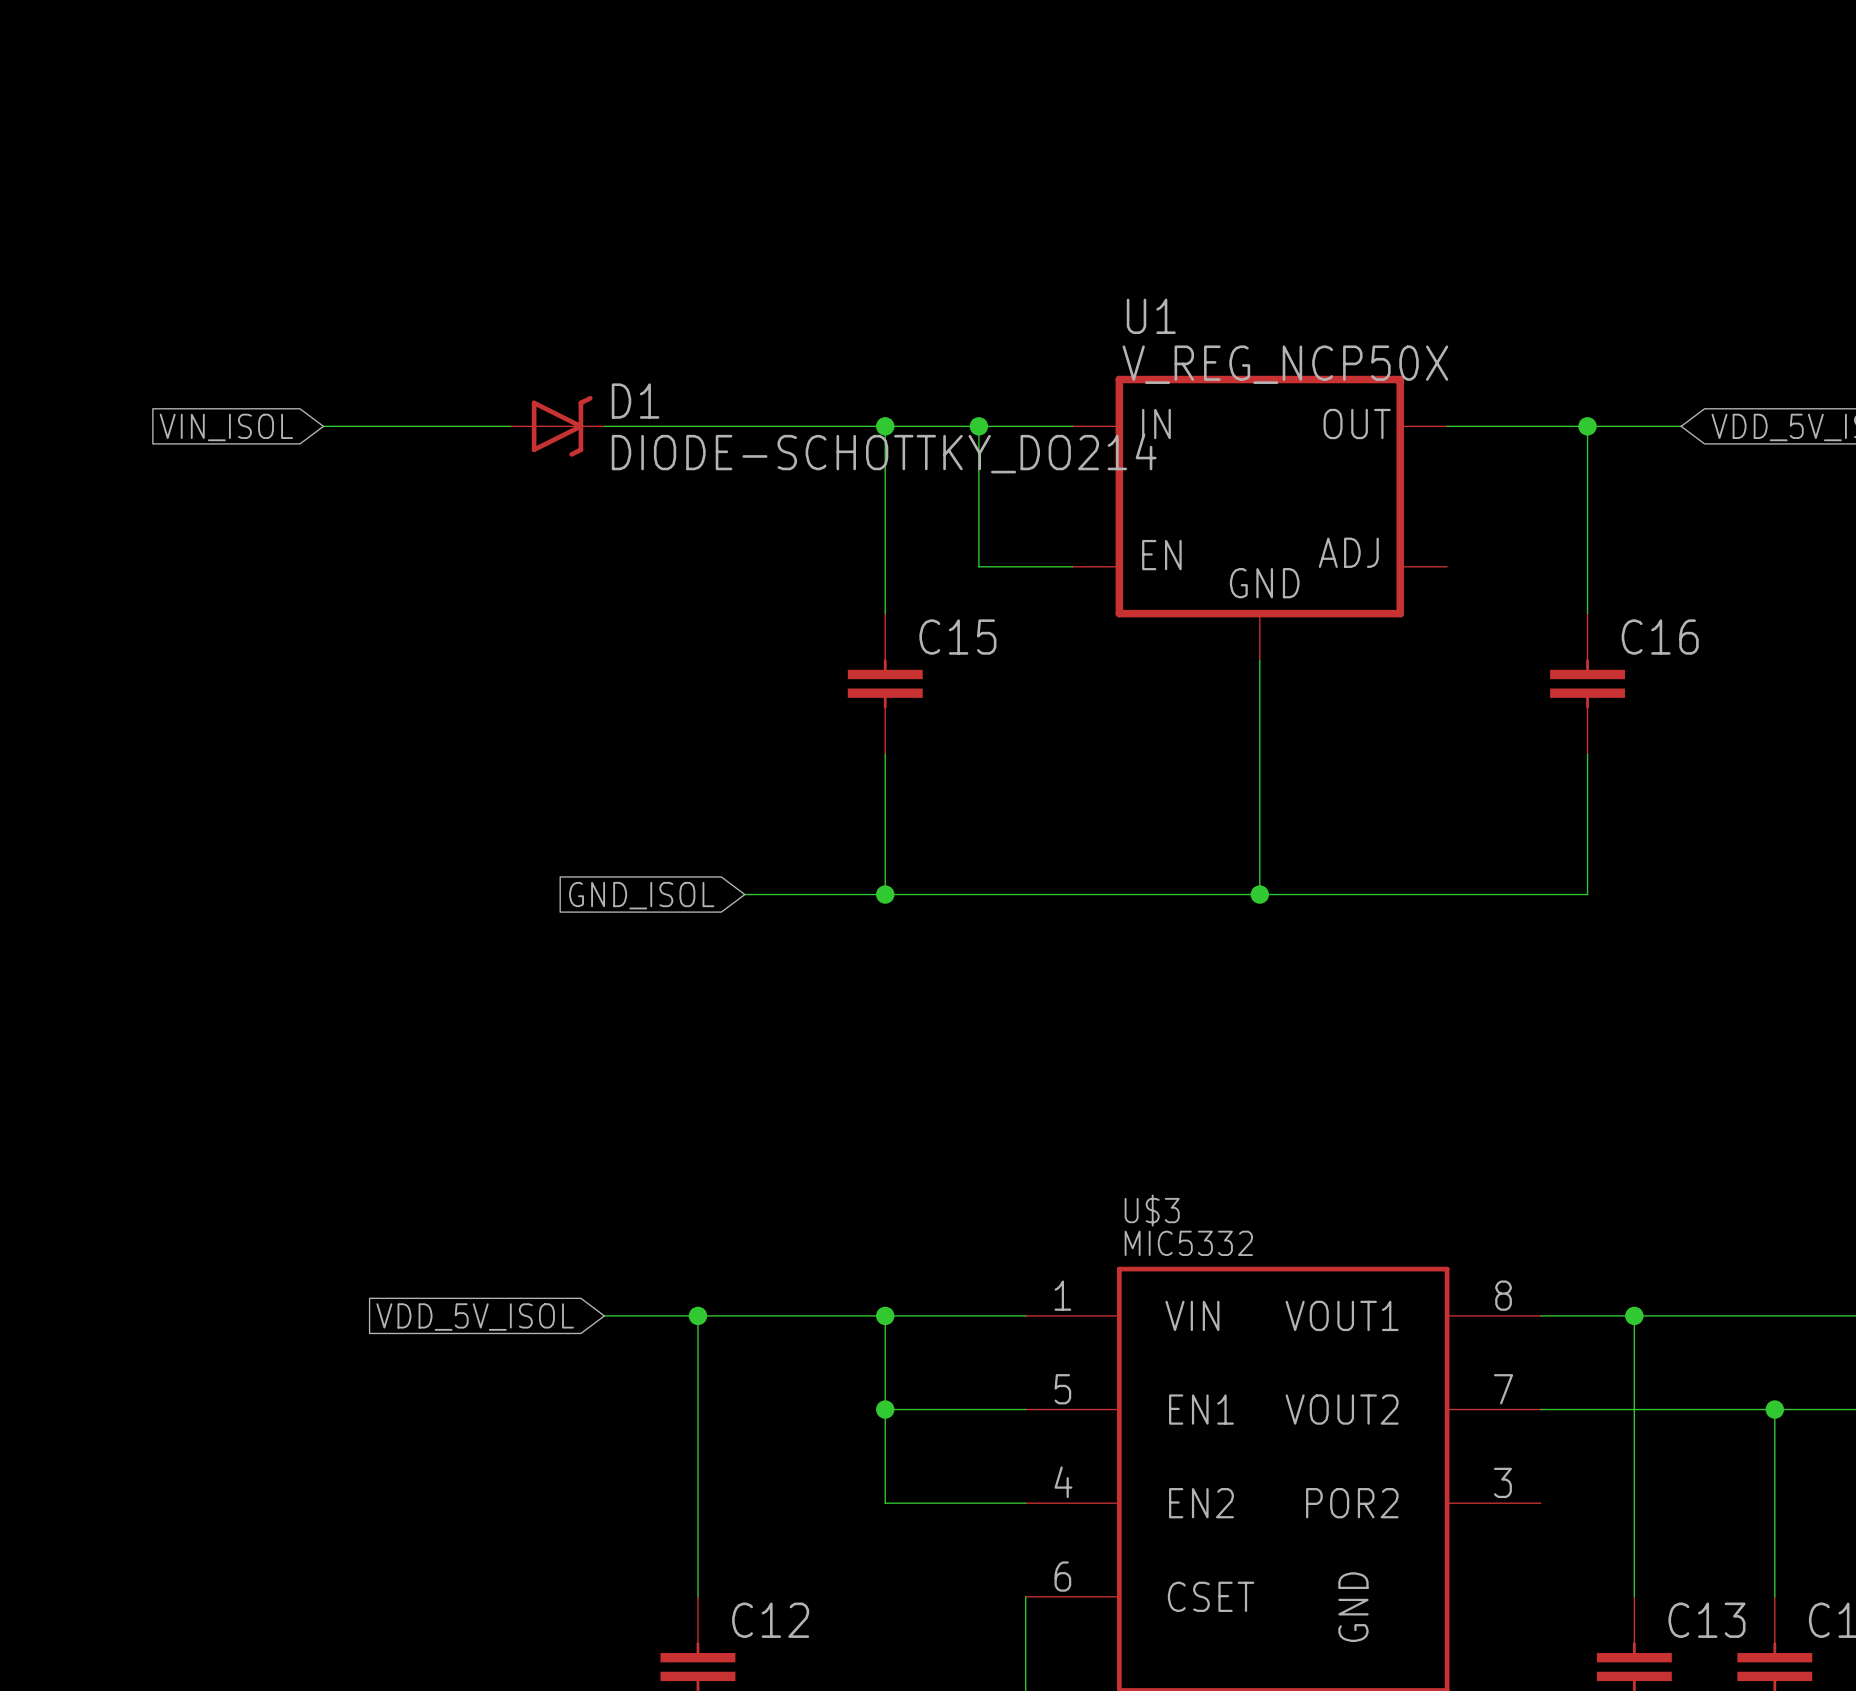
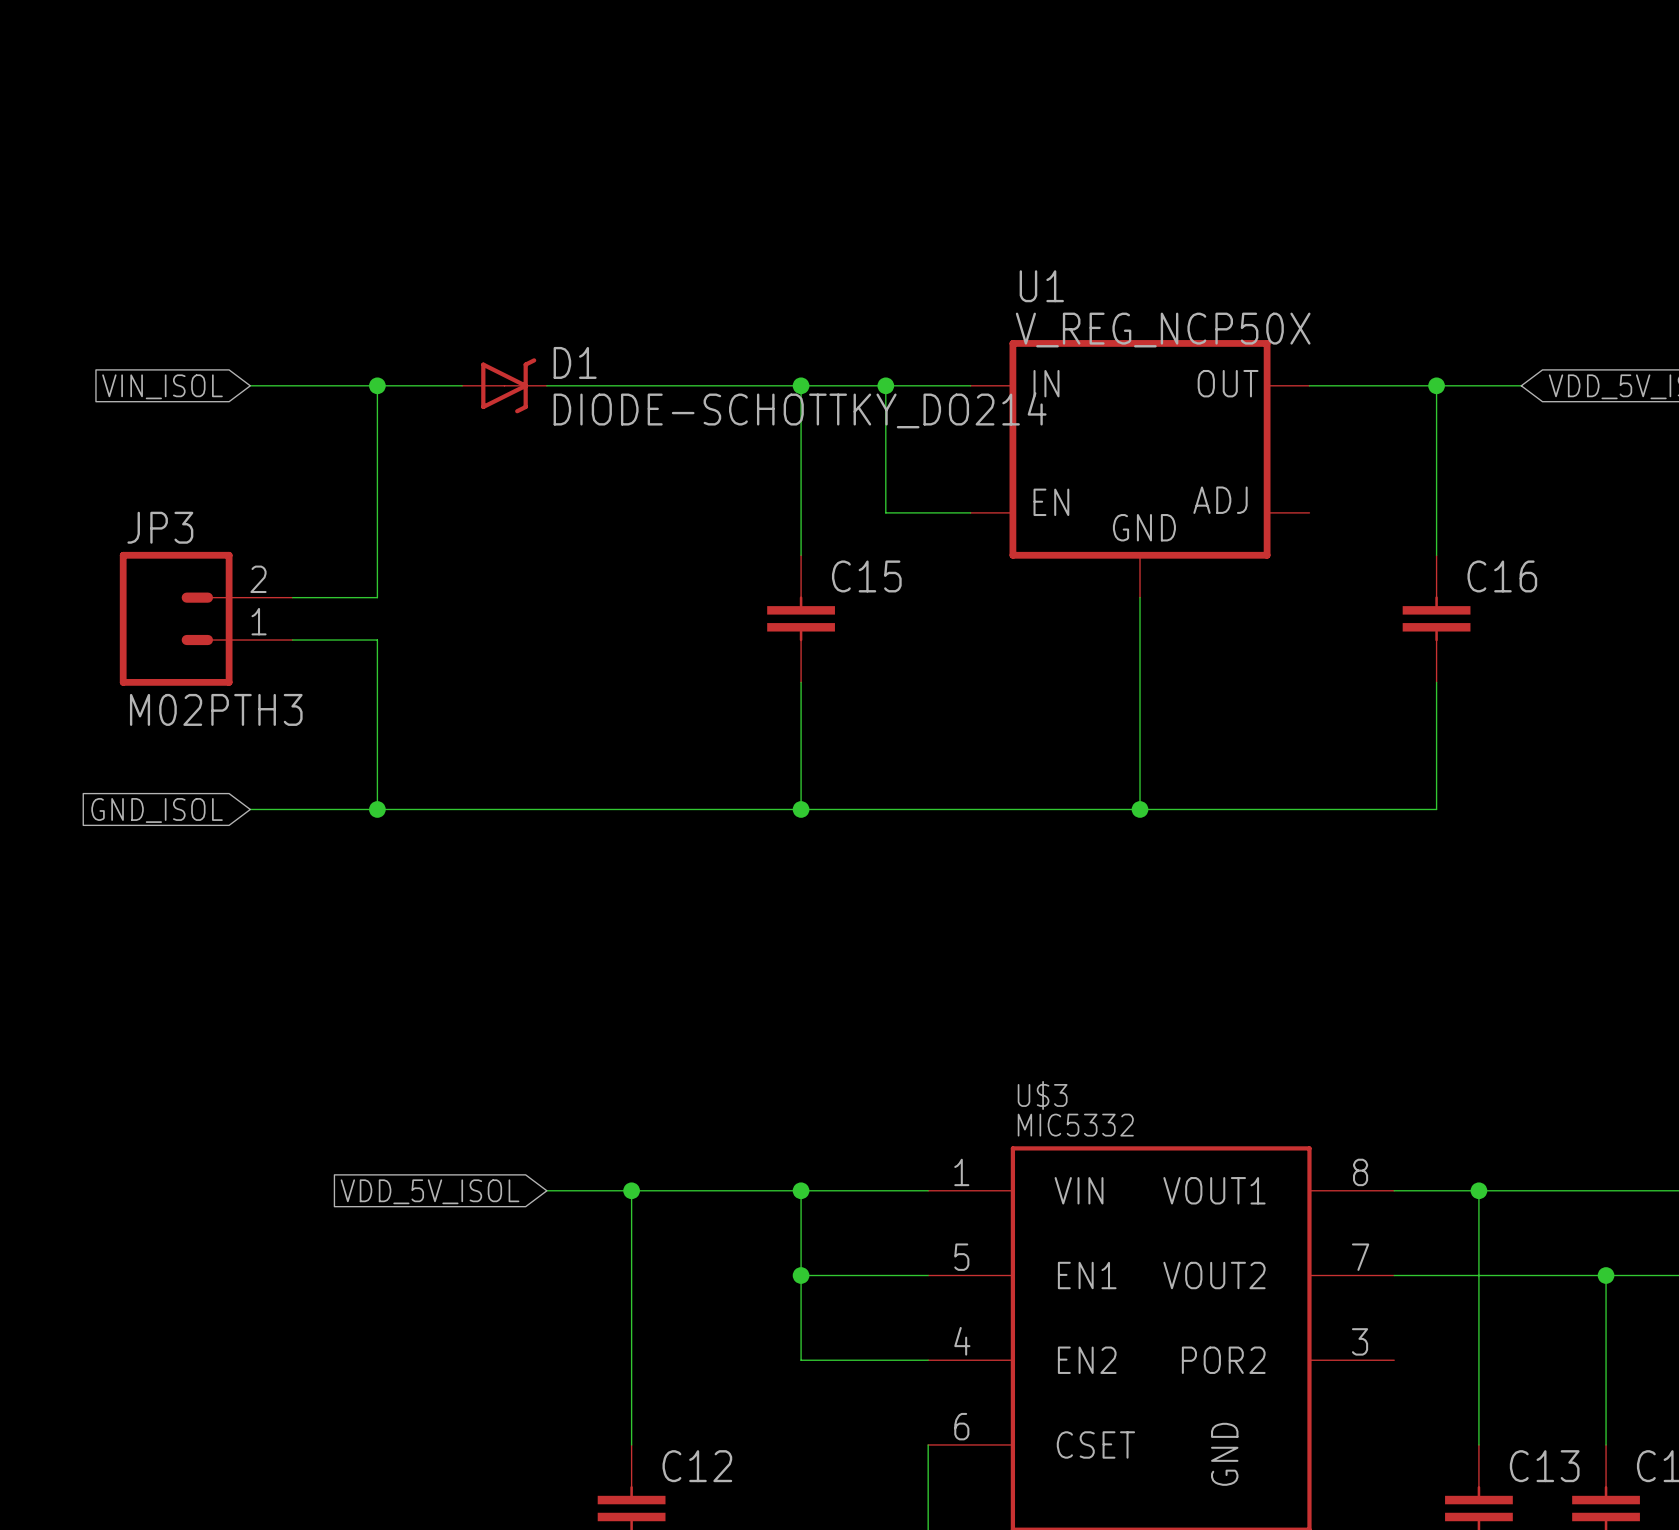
wire: none -> (250, 385) (292, 385)
wire: none -> (377, 385) (377, 597) (292, 597)
junction: none -> (377, 385)
global label position: VIN_ISOL (226, 427) -> VIN_ISOL (162, 386)
JP3: none -> M02PTH3 (206, 618)
wire: none -> (292, 640) (377, 640) (377, 809)
wire: none -> (250, 809) (673, 809)
junction: none -> (377, 809)
global label: none -> GND_ISOL (157, 810)
global label: GND_ISOL (641, 895) -> none

